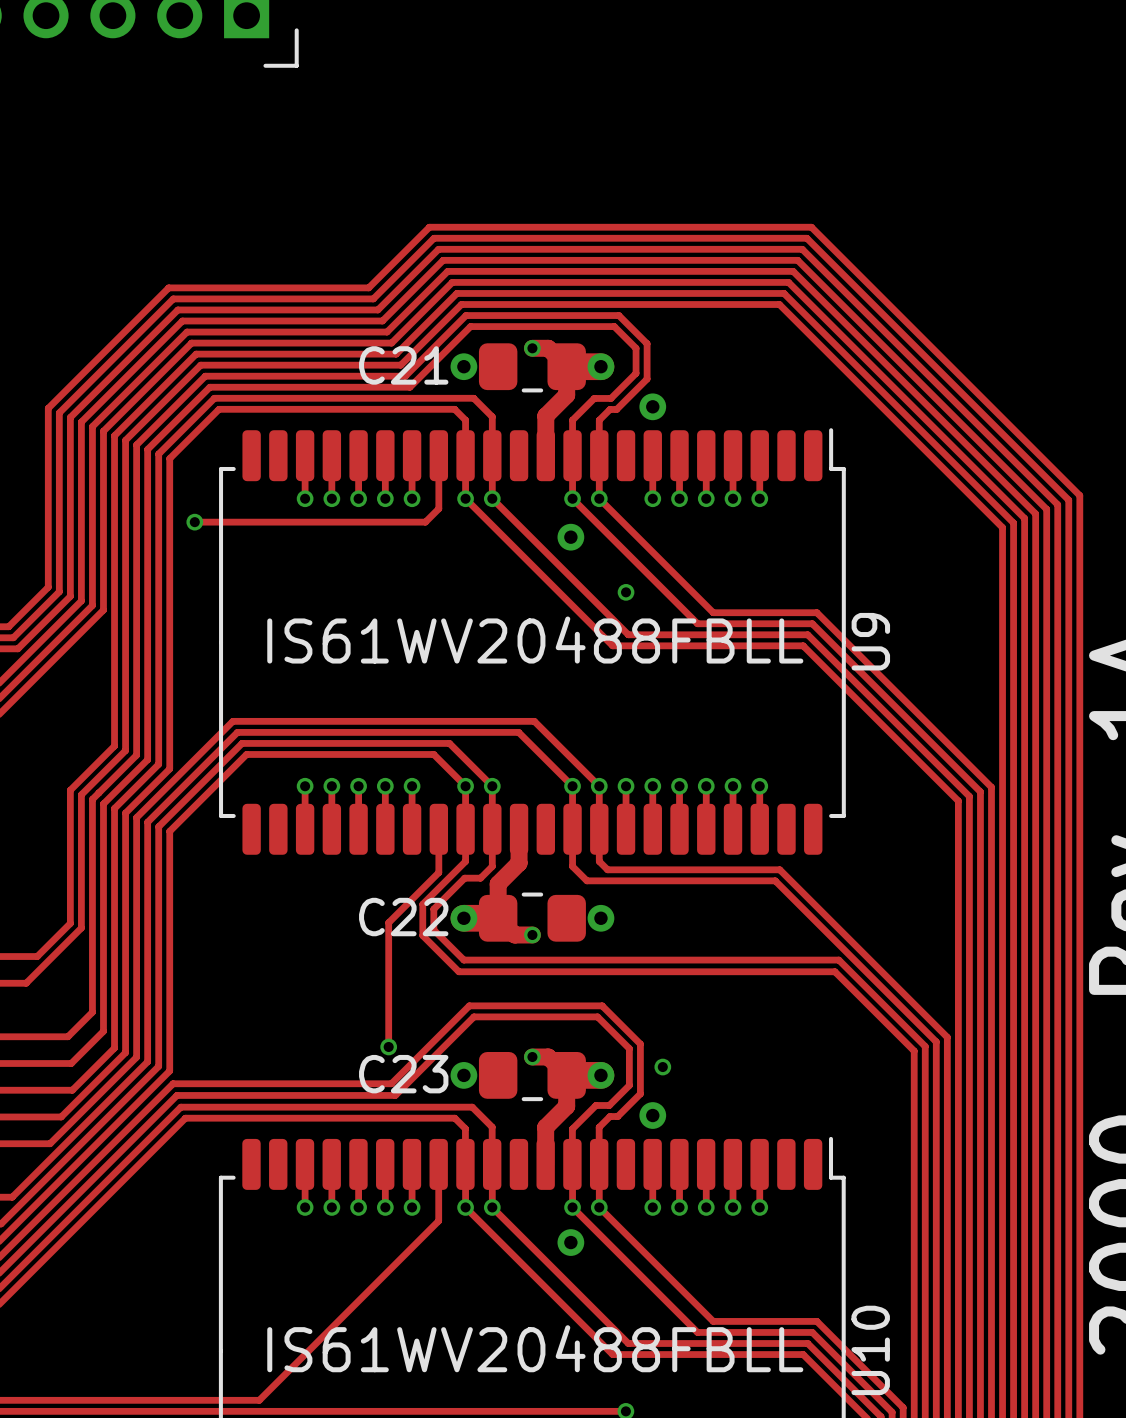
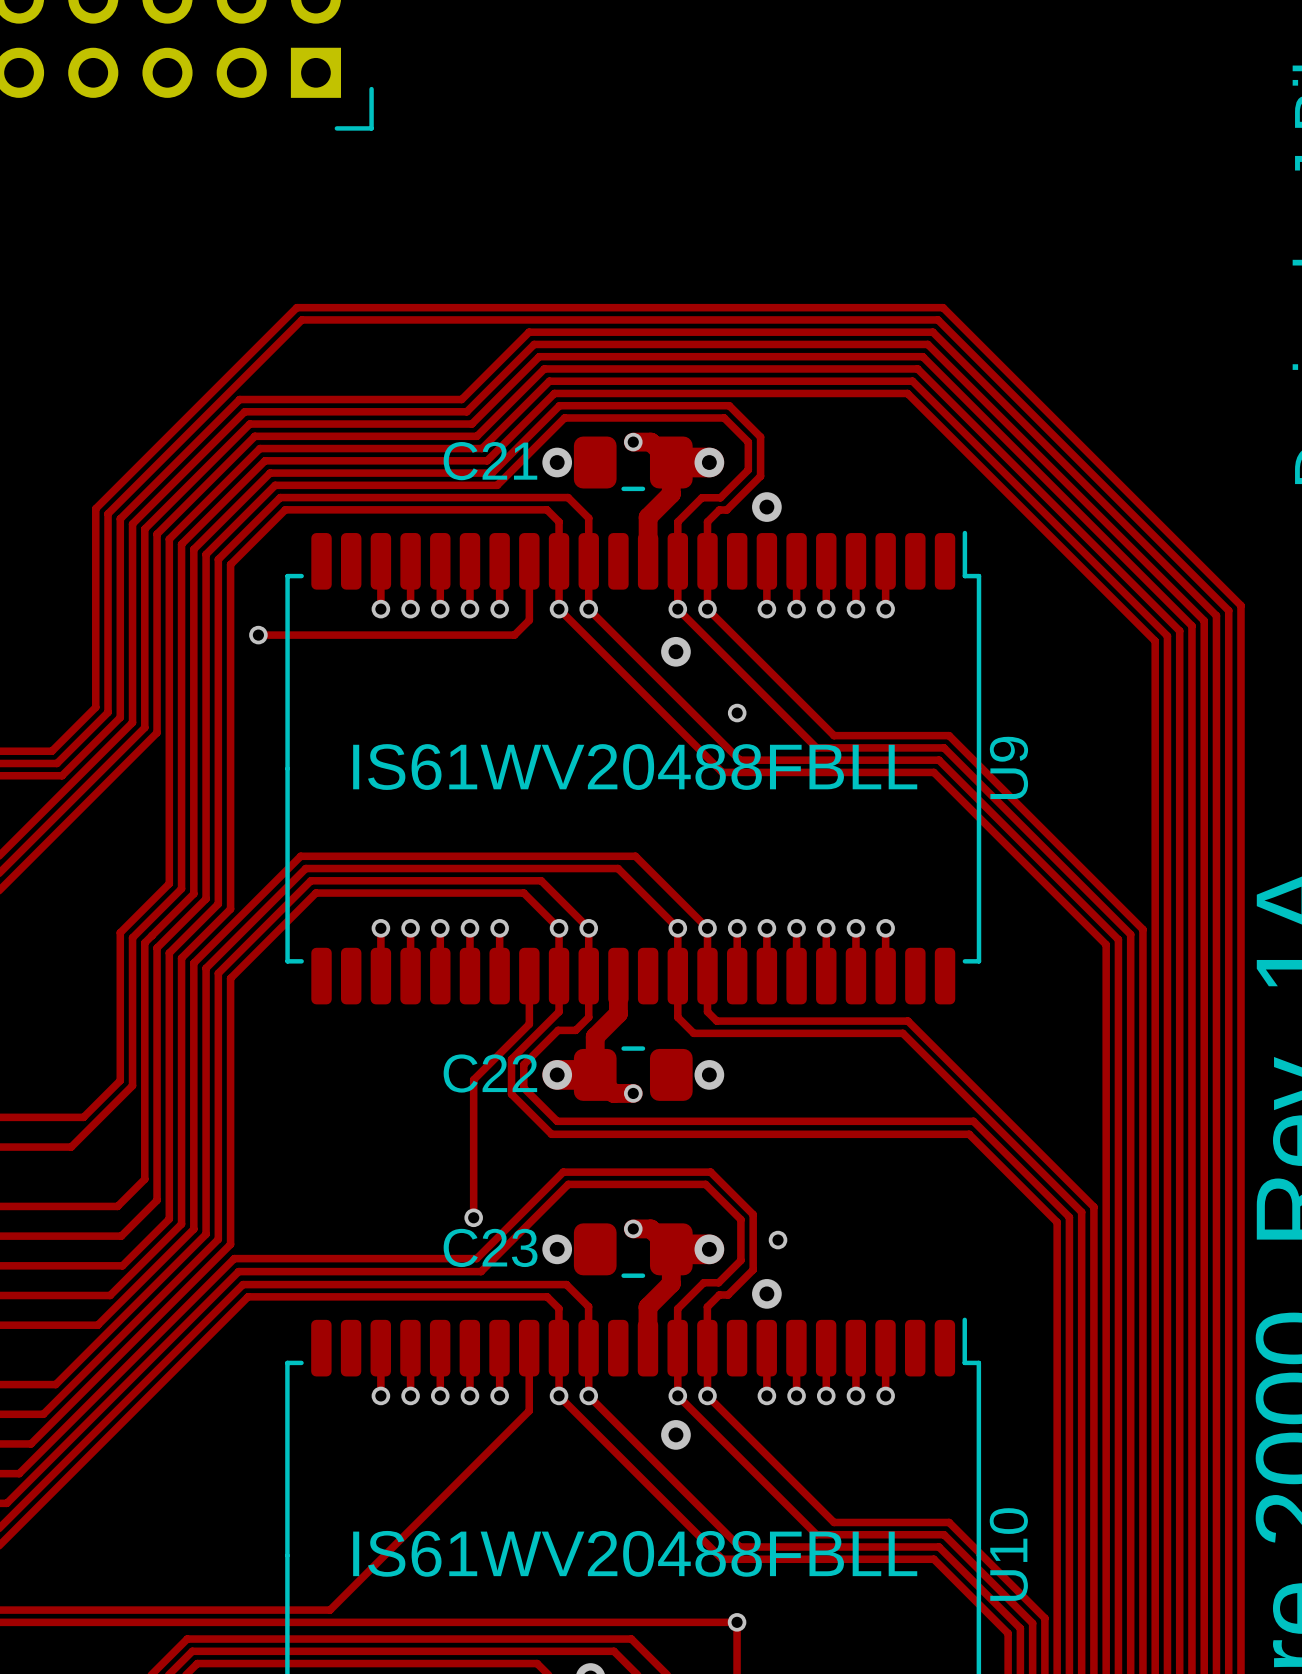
track: (429, 227) (368, 287) (168, 287) -> (518, 307) (296, 307) (229, 375)
track: (434, 238) (373, 298) (173, 298) -> (524, 319) (301, 319) (234, 387)

